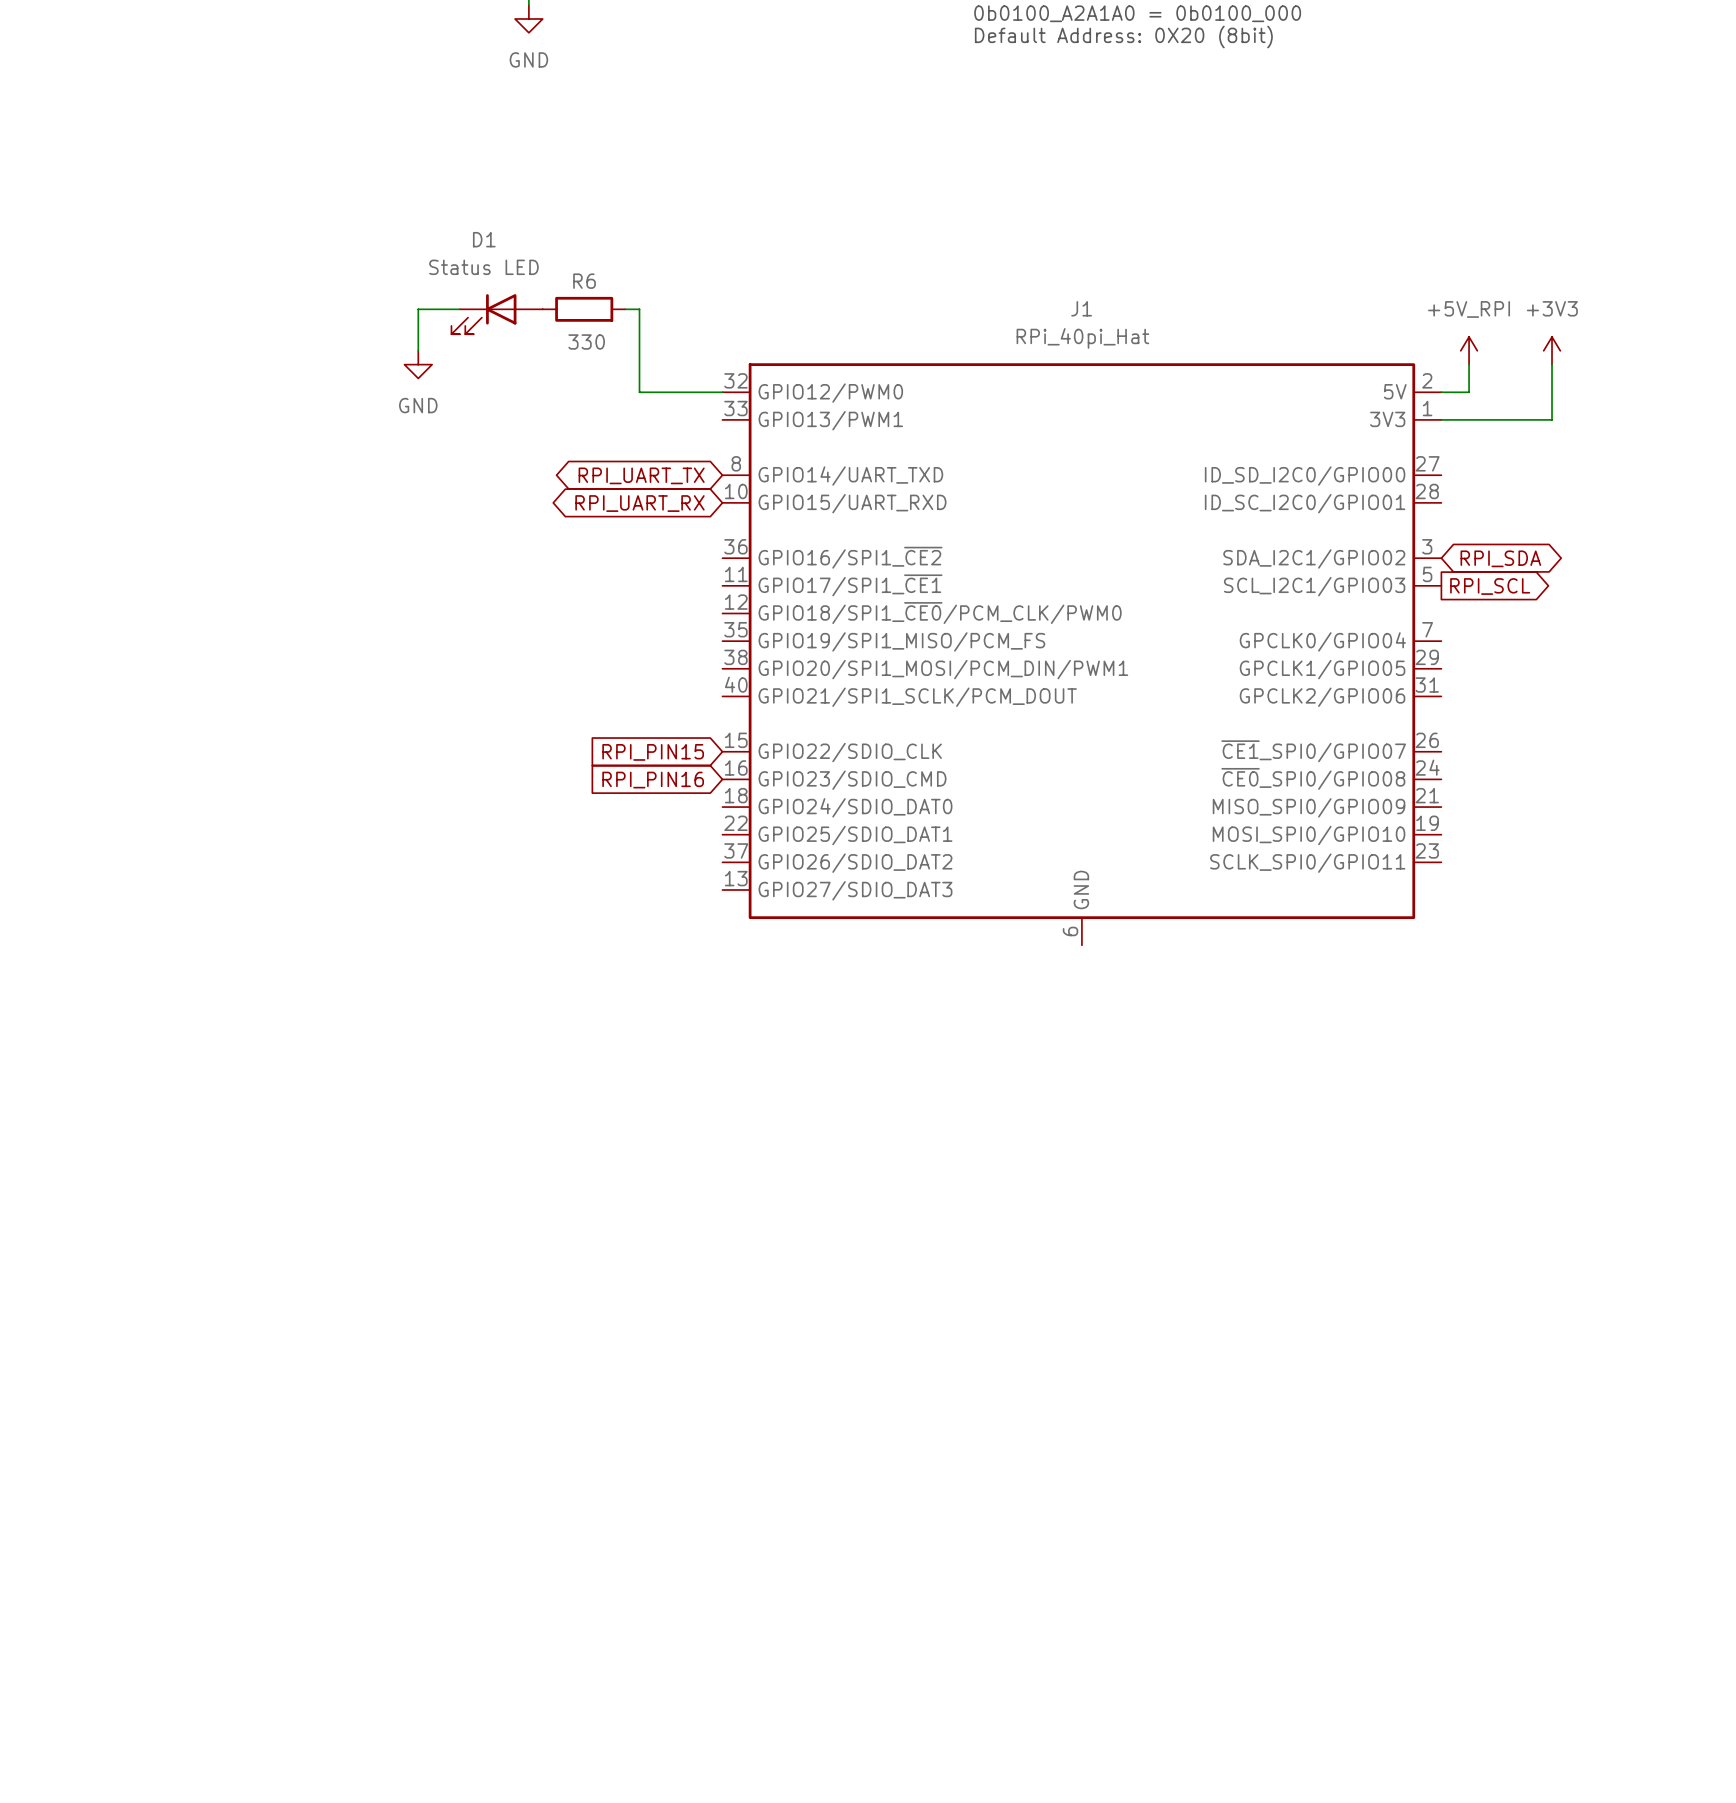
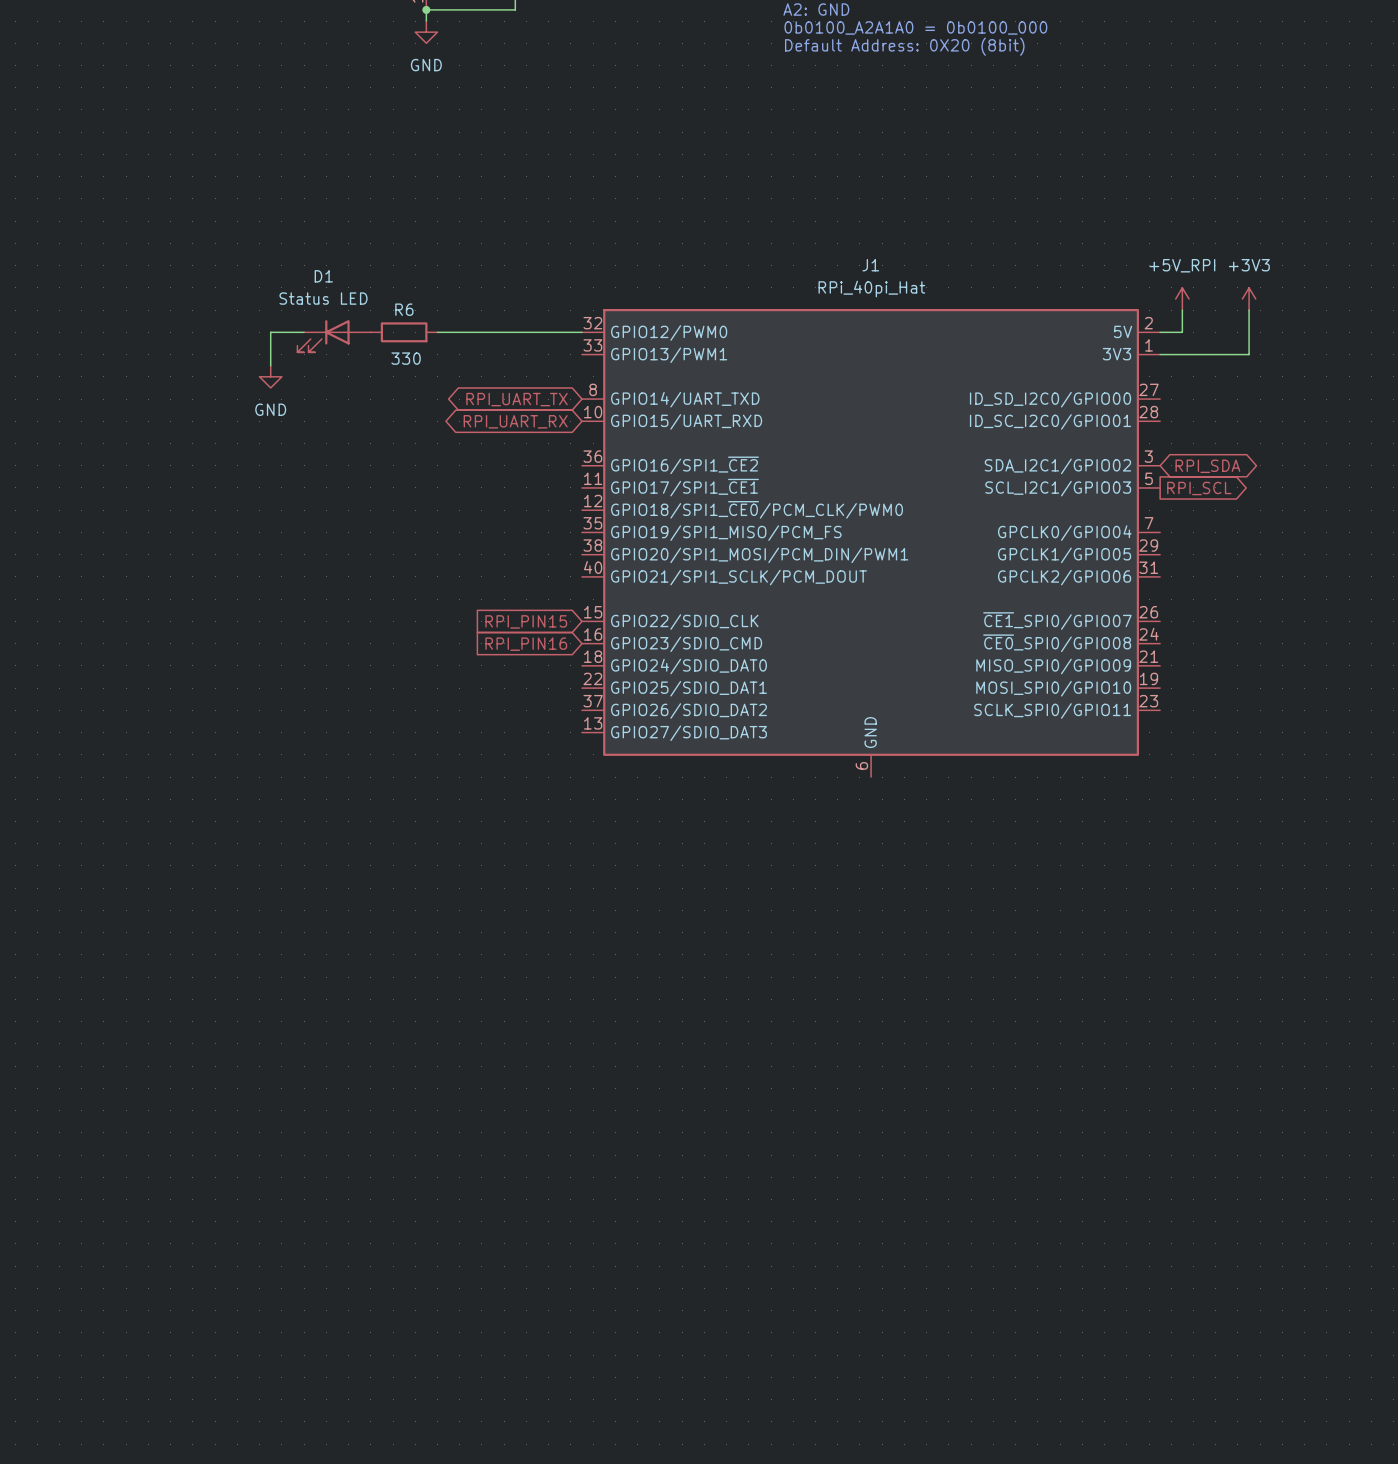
wire: (459, 309) (418, 309) (418, 350) -> (304, 332) (270, 332) (270, 365)
R6 position: (584, 309) -> (404, 332)
wire: (625, 309) (639, 309) (639, 392) -> (437, 332) (515, 332)
D1 position: (497, 314) -> (334, 336)
power symbol position: GND (418, 364) -> GND (270, 376)

